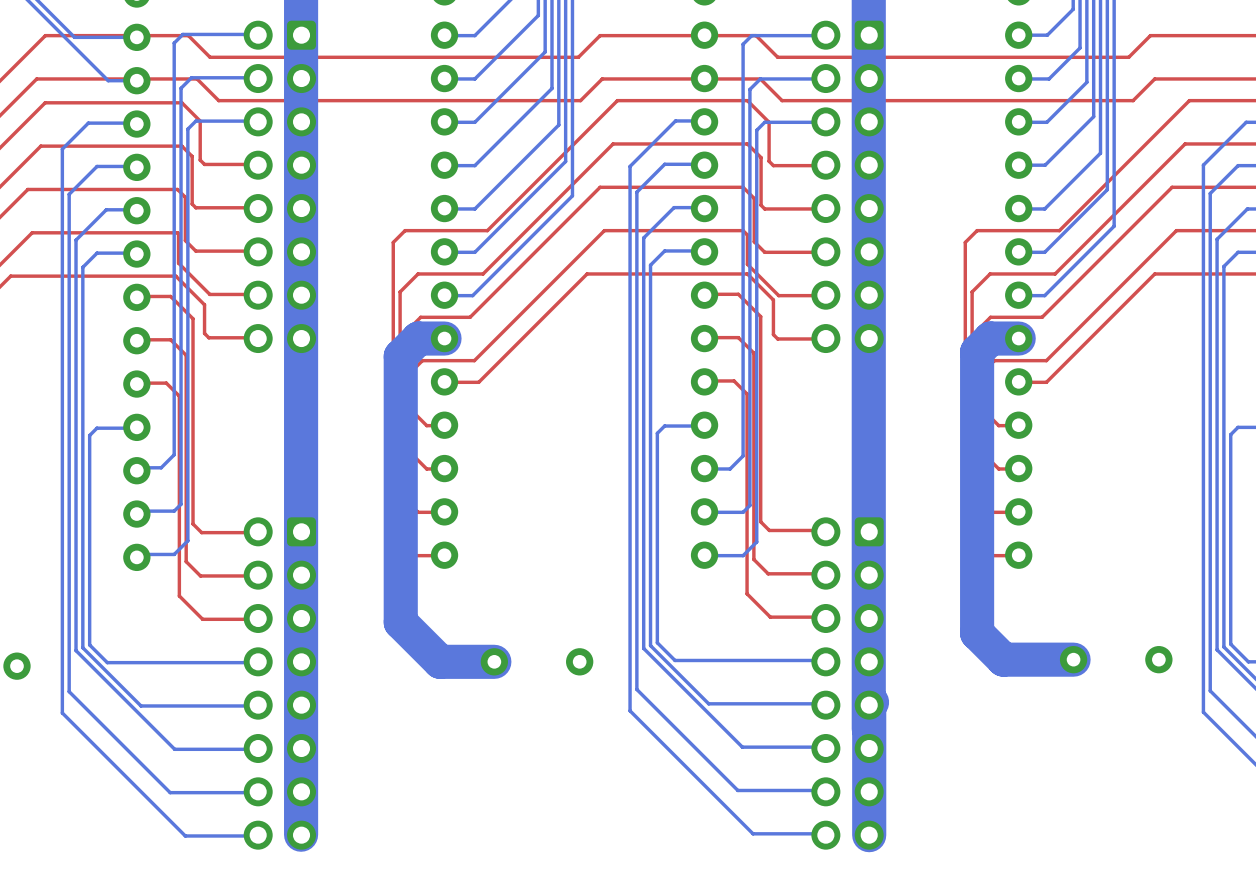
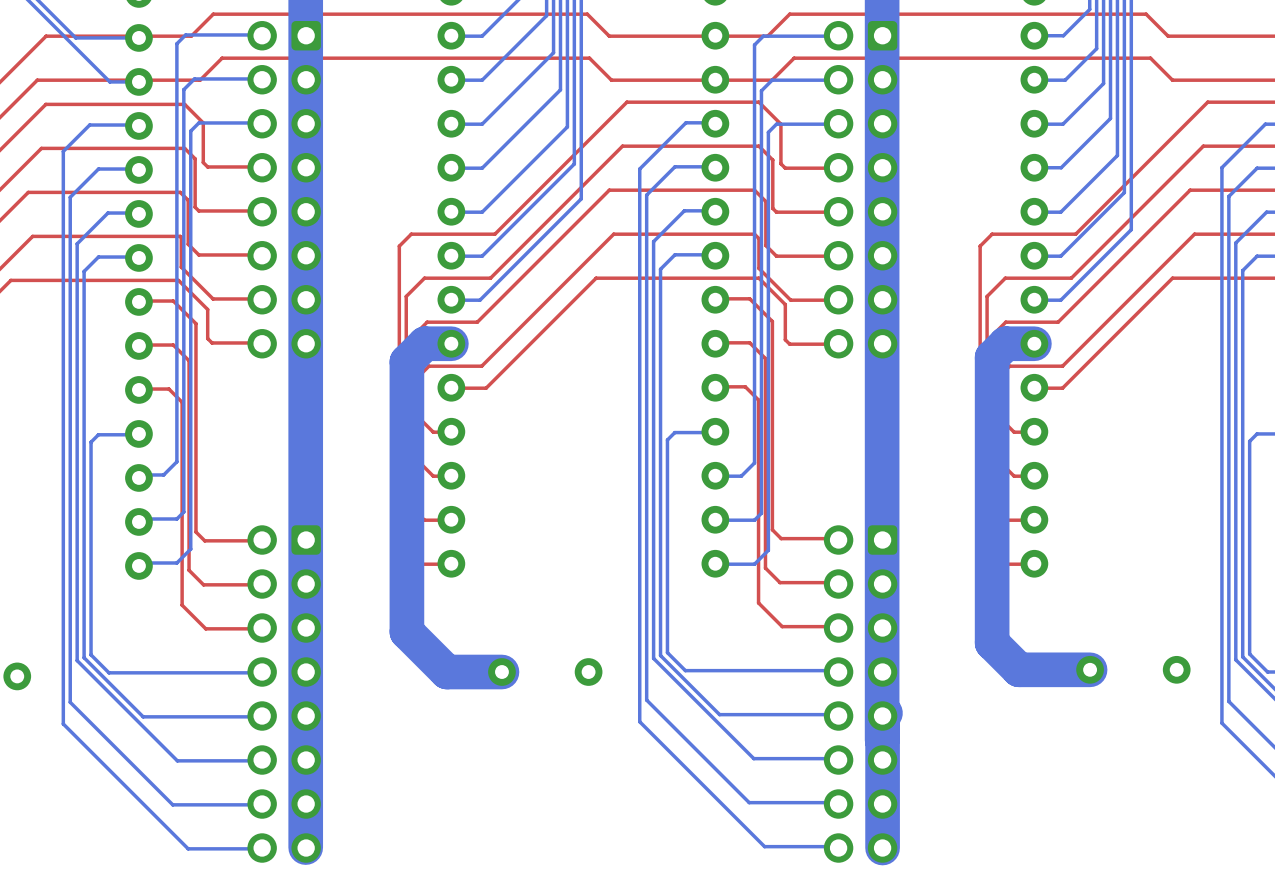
top track: (188, 35) (210, 57) (218, 57) -> (200, 80) (222, 58)
top track: (600, 35) (578, 57) -> (611, 80) (587, 58)
top track: none -> (609, 36) (587, 14) (213, 14) (191, 36)
top track: (756, 35) (777, 57) (782, 57) -> (772, 80) (794, 58)
top track: (1150, 35) (1128, 57) -> (1172, 80) (1150, 58) (1146, 58)
top track: none -> (1168, 36) (1146, 14) (789, 14) (767, 36)
top track: (602, 78) (580, 100) (218, 100) (197, 78) -> none
top track: (1154, 78) (1133, 100) (782, 100) (760, 78) -> none

